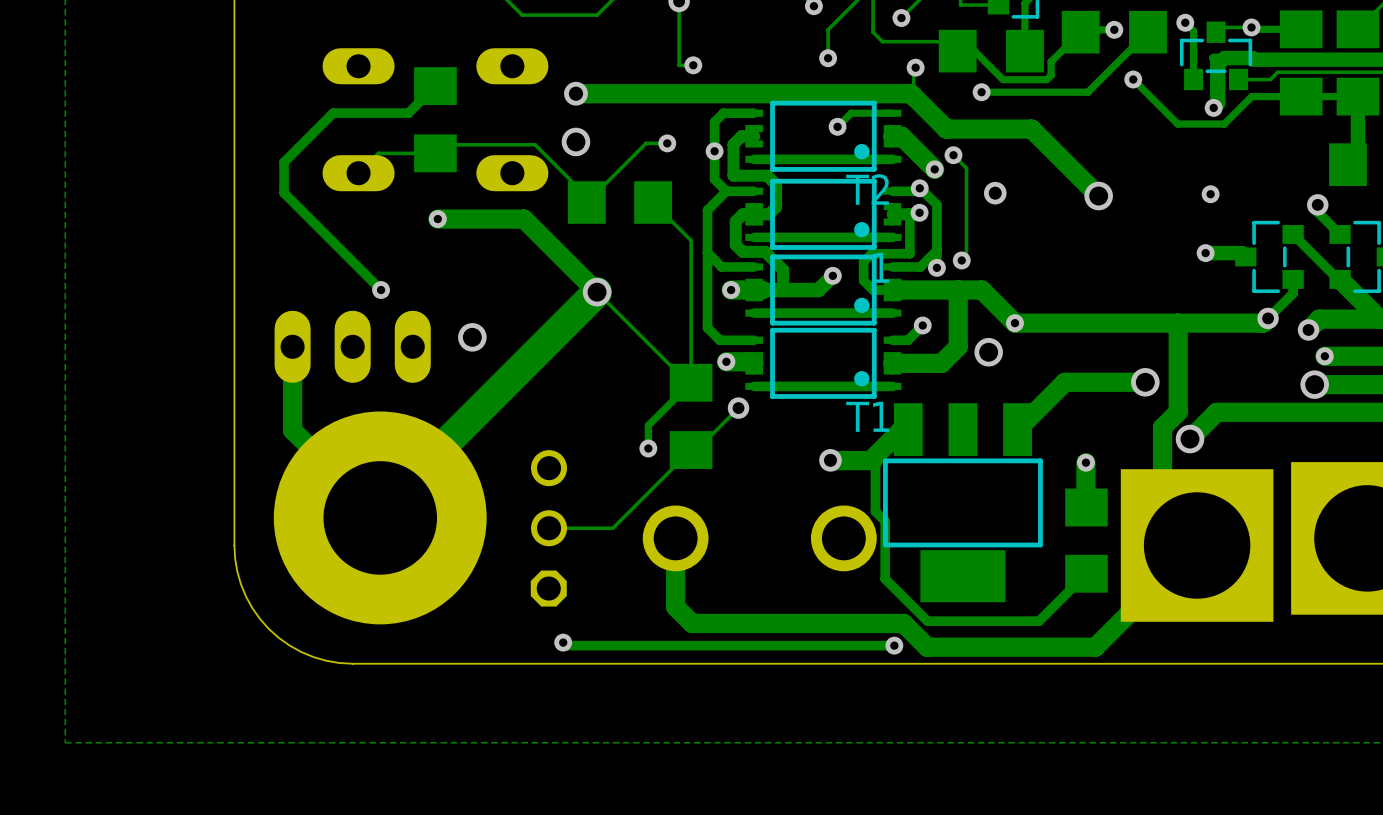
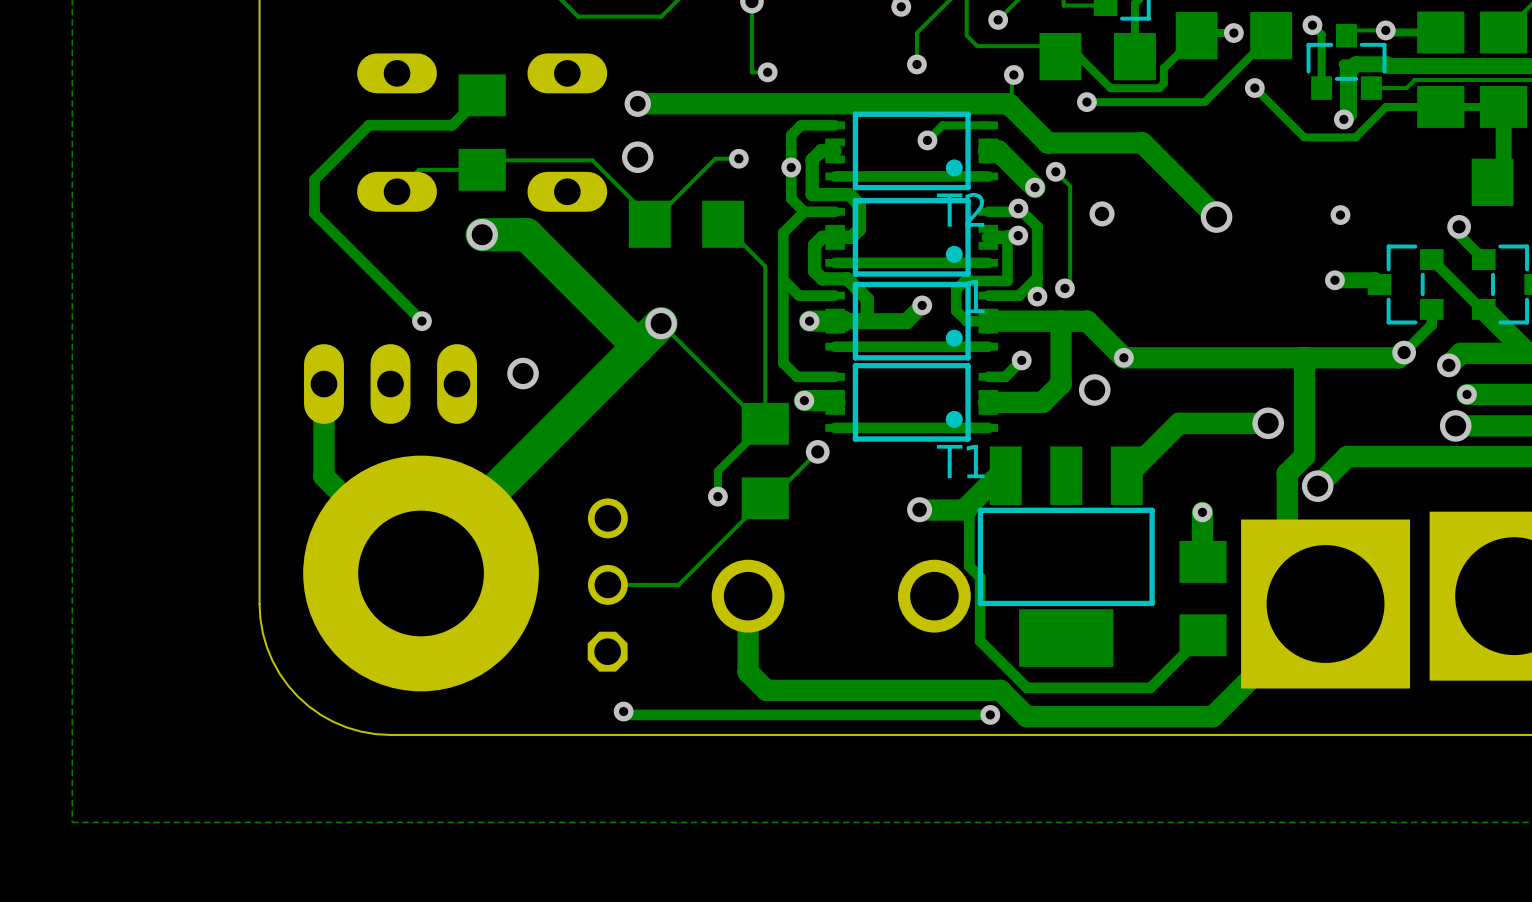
via size: [428, 210, 447, 229] -> [466, 218, 498, 251]
track: none -> (482, 234) (526, 234) (638, 346)
track: (437, 219) (523, 219) (597, 292) -> none

